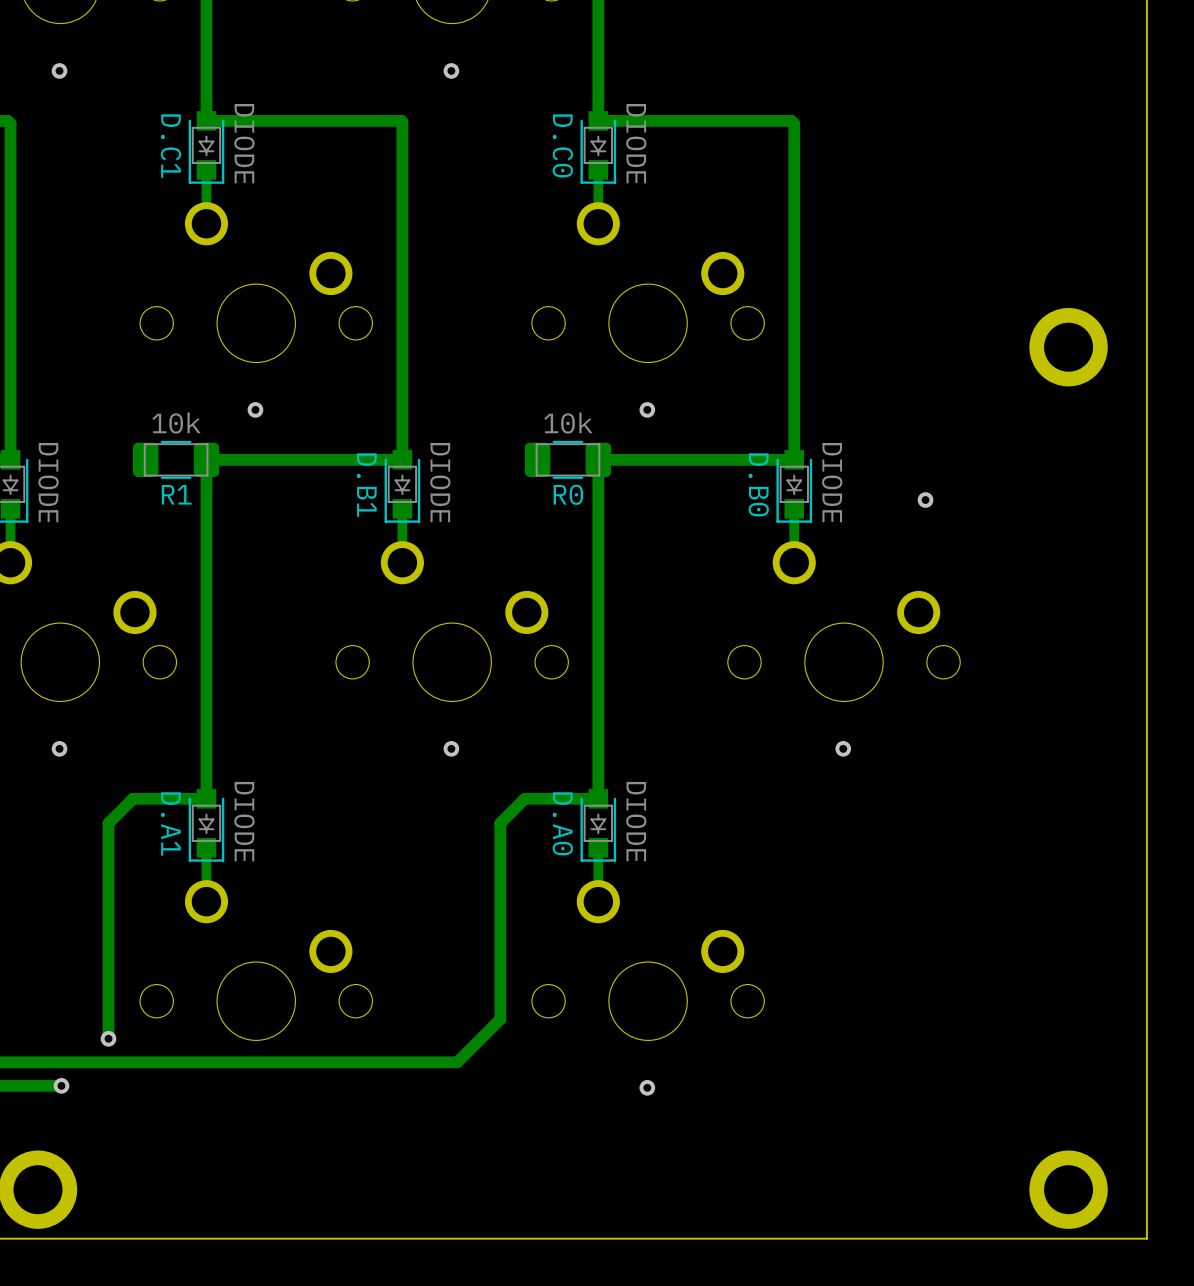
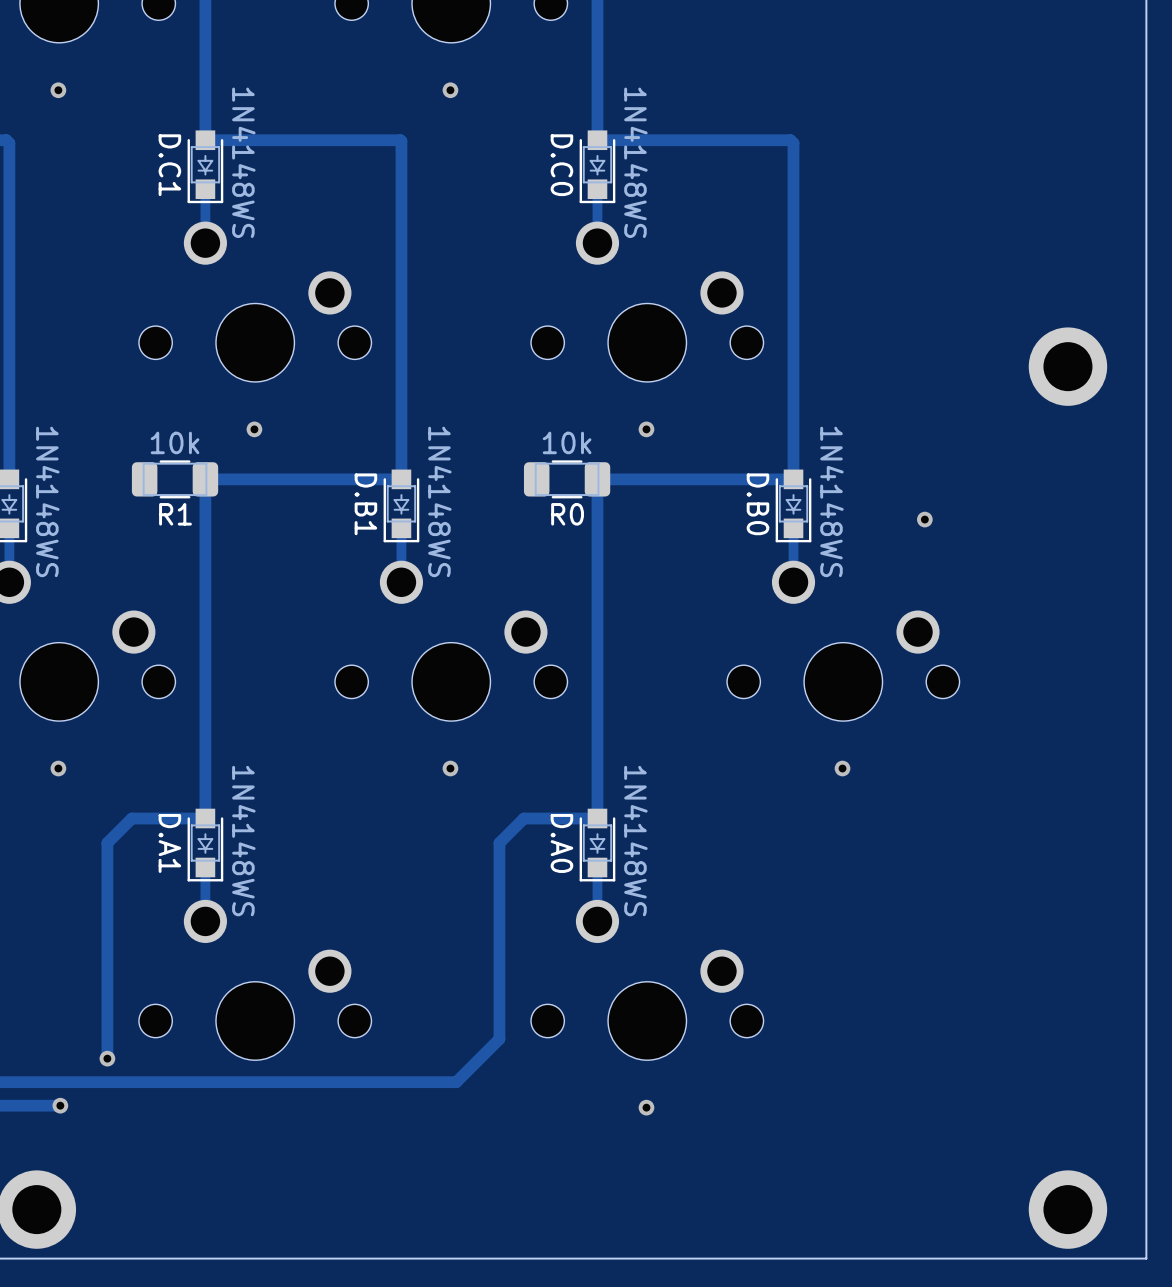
D.C1 value: DIODE (244, 143) -> 1N4148WS (243, 162)
D.C0 value: DIODE (636, 143) -> 1N4148WS (635, 162)
part value: DIODE (48, 482) -> 1N4148WS (47, 501)
D.B1 value: DIODE (440, 482) -> 1N4148WS (439, 501)
D.B0 value: DIODE (832, 482) -> 1N4148WS (831, 501)
D.A1 value: DIODE (244, 821) -> 1N4148WS (243, 841)
D.A0 value: DIODE (636, 821) -> 1N4148WS (635, 841)

